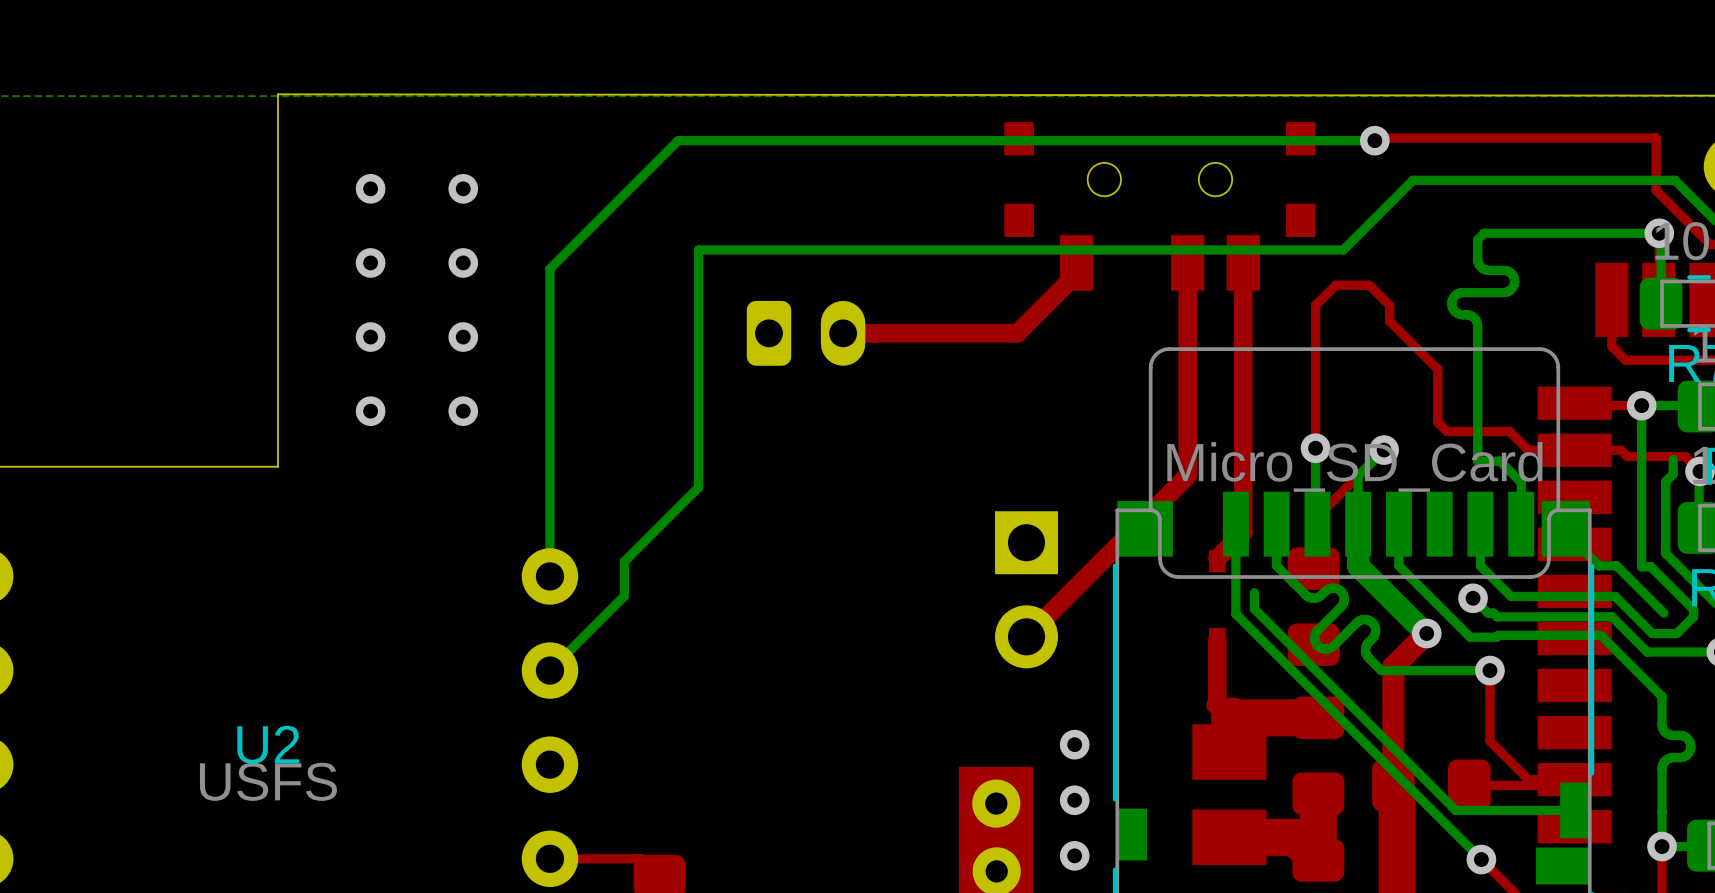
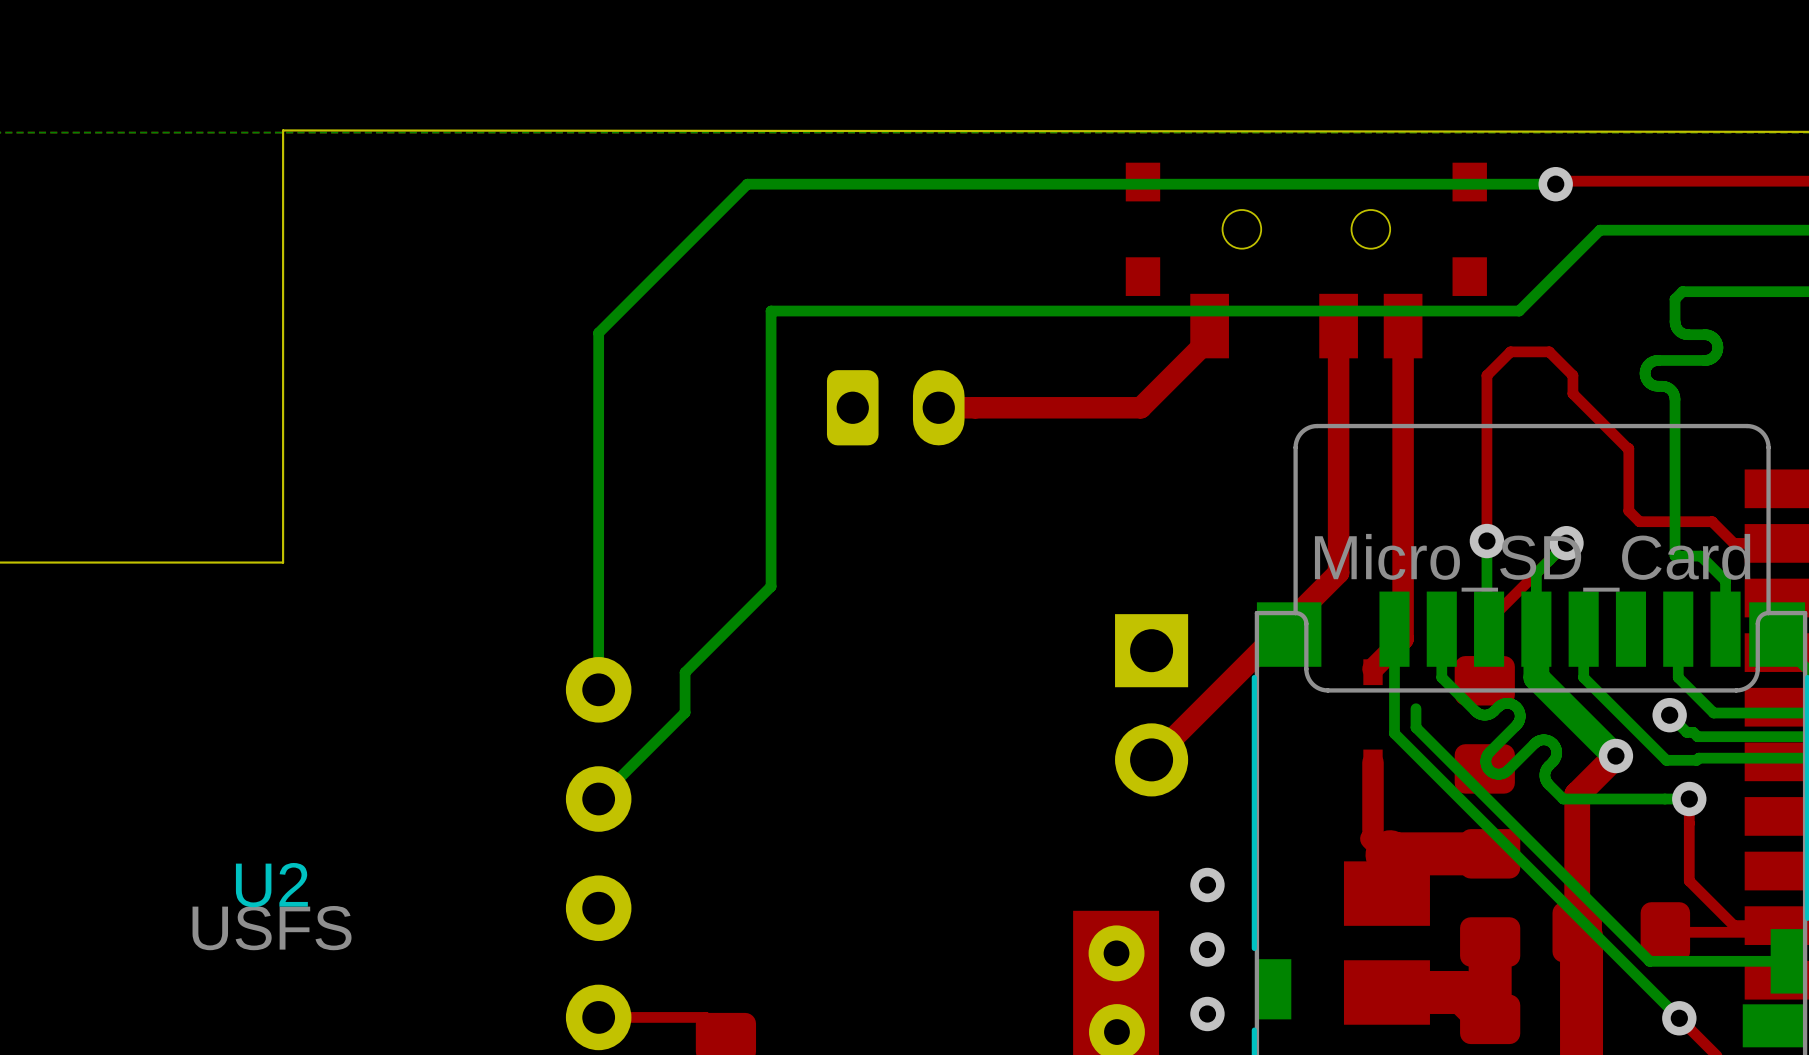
via: (370, 188) -> none
via: (463, 188) -> none
via: (370, 262) -> none
via: (463, 262) -> none
via: (370, 337) -> none
via: (463, 337) -> none
via: (370, 411) -> none
via: (463, 411) -> none

